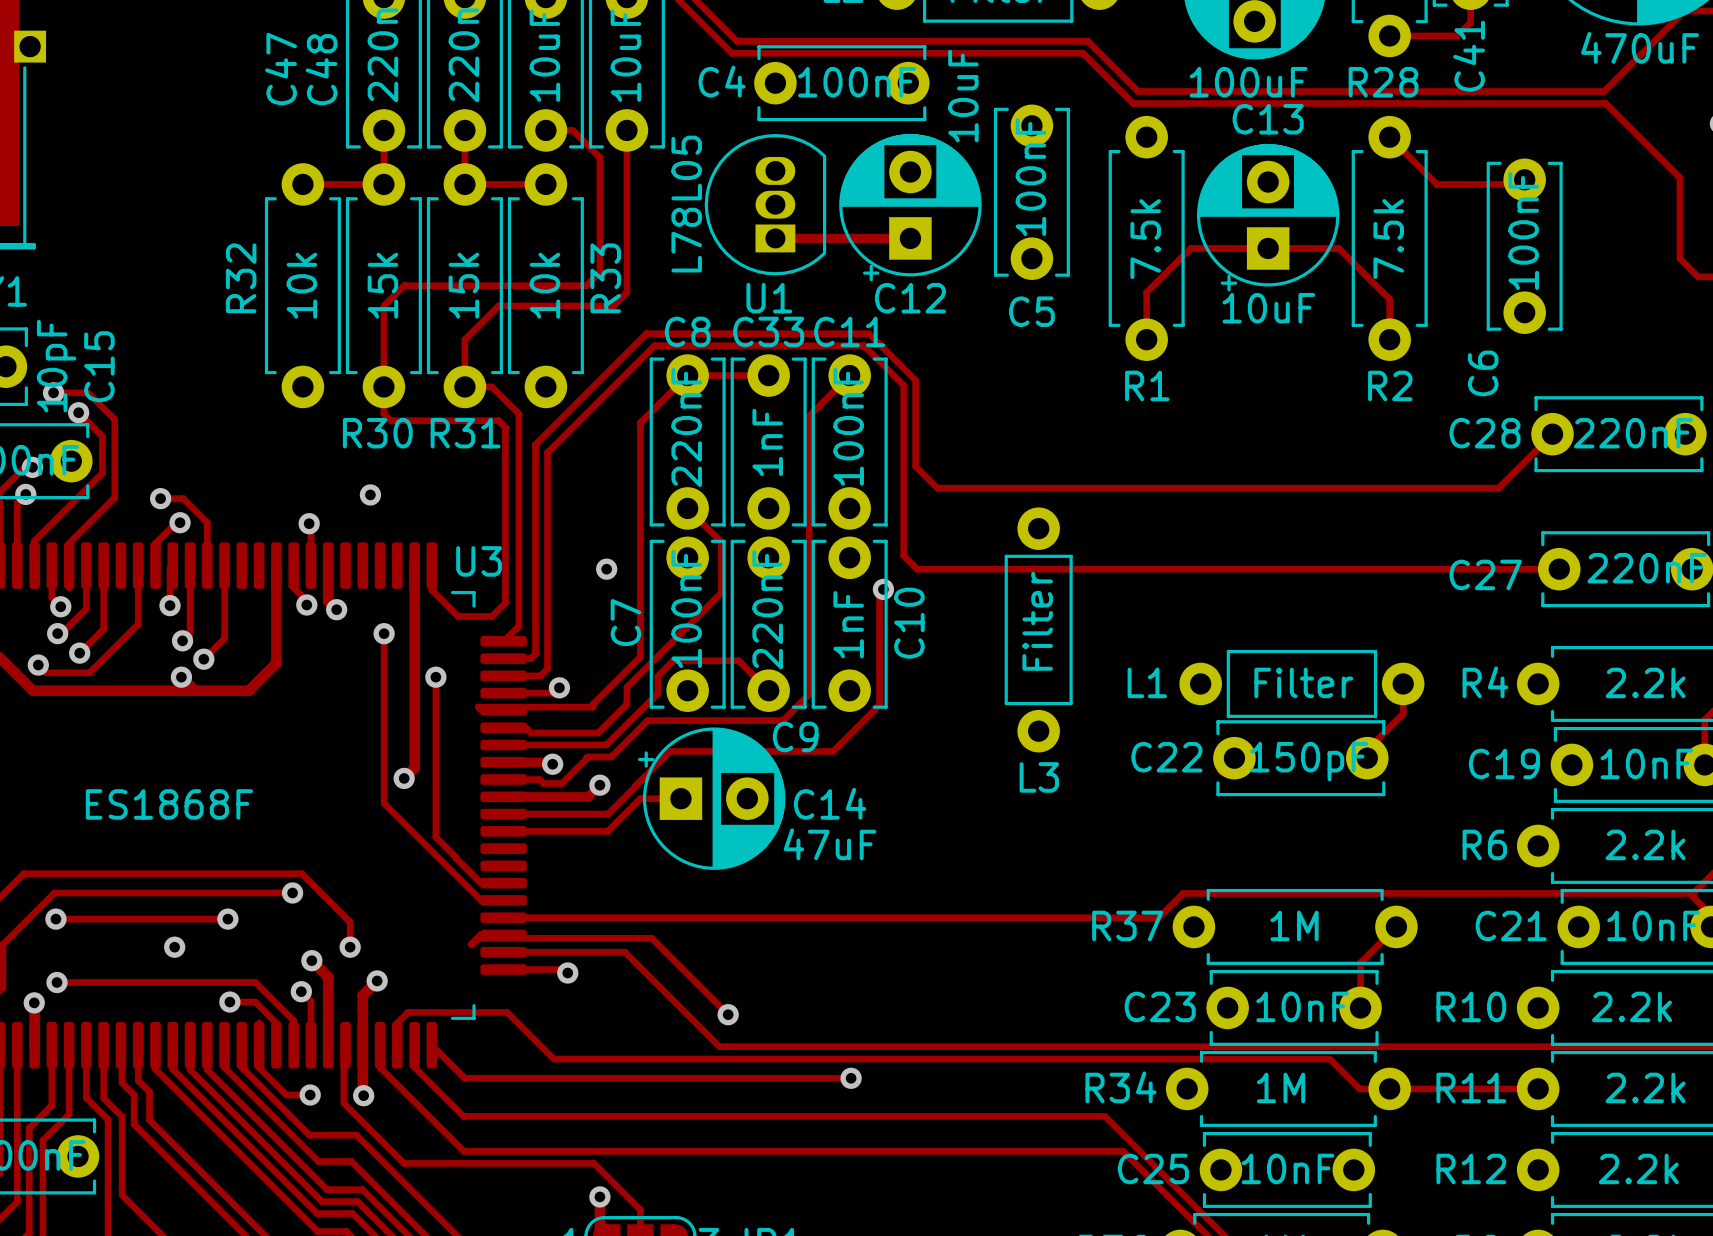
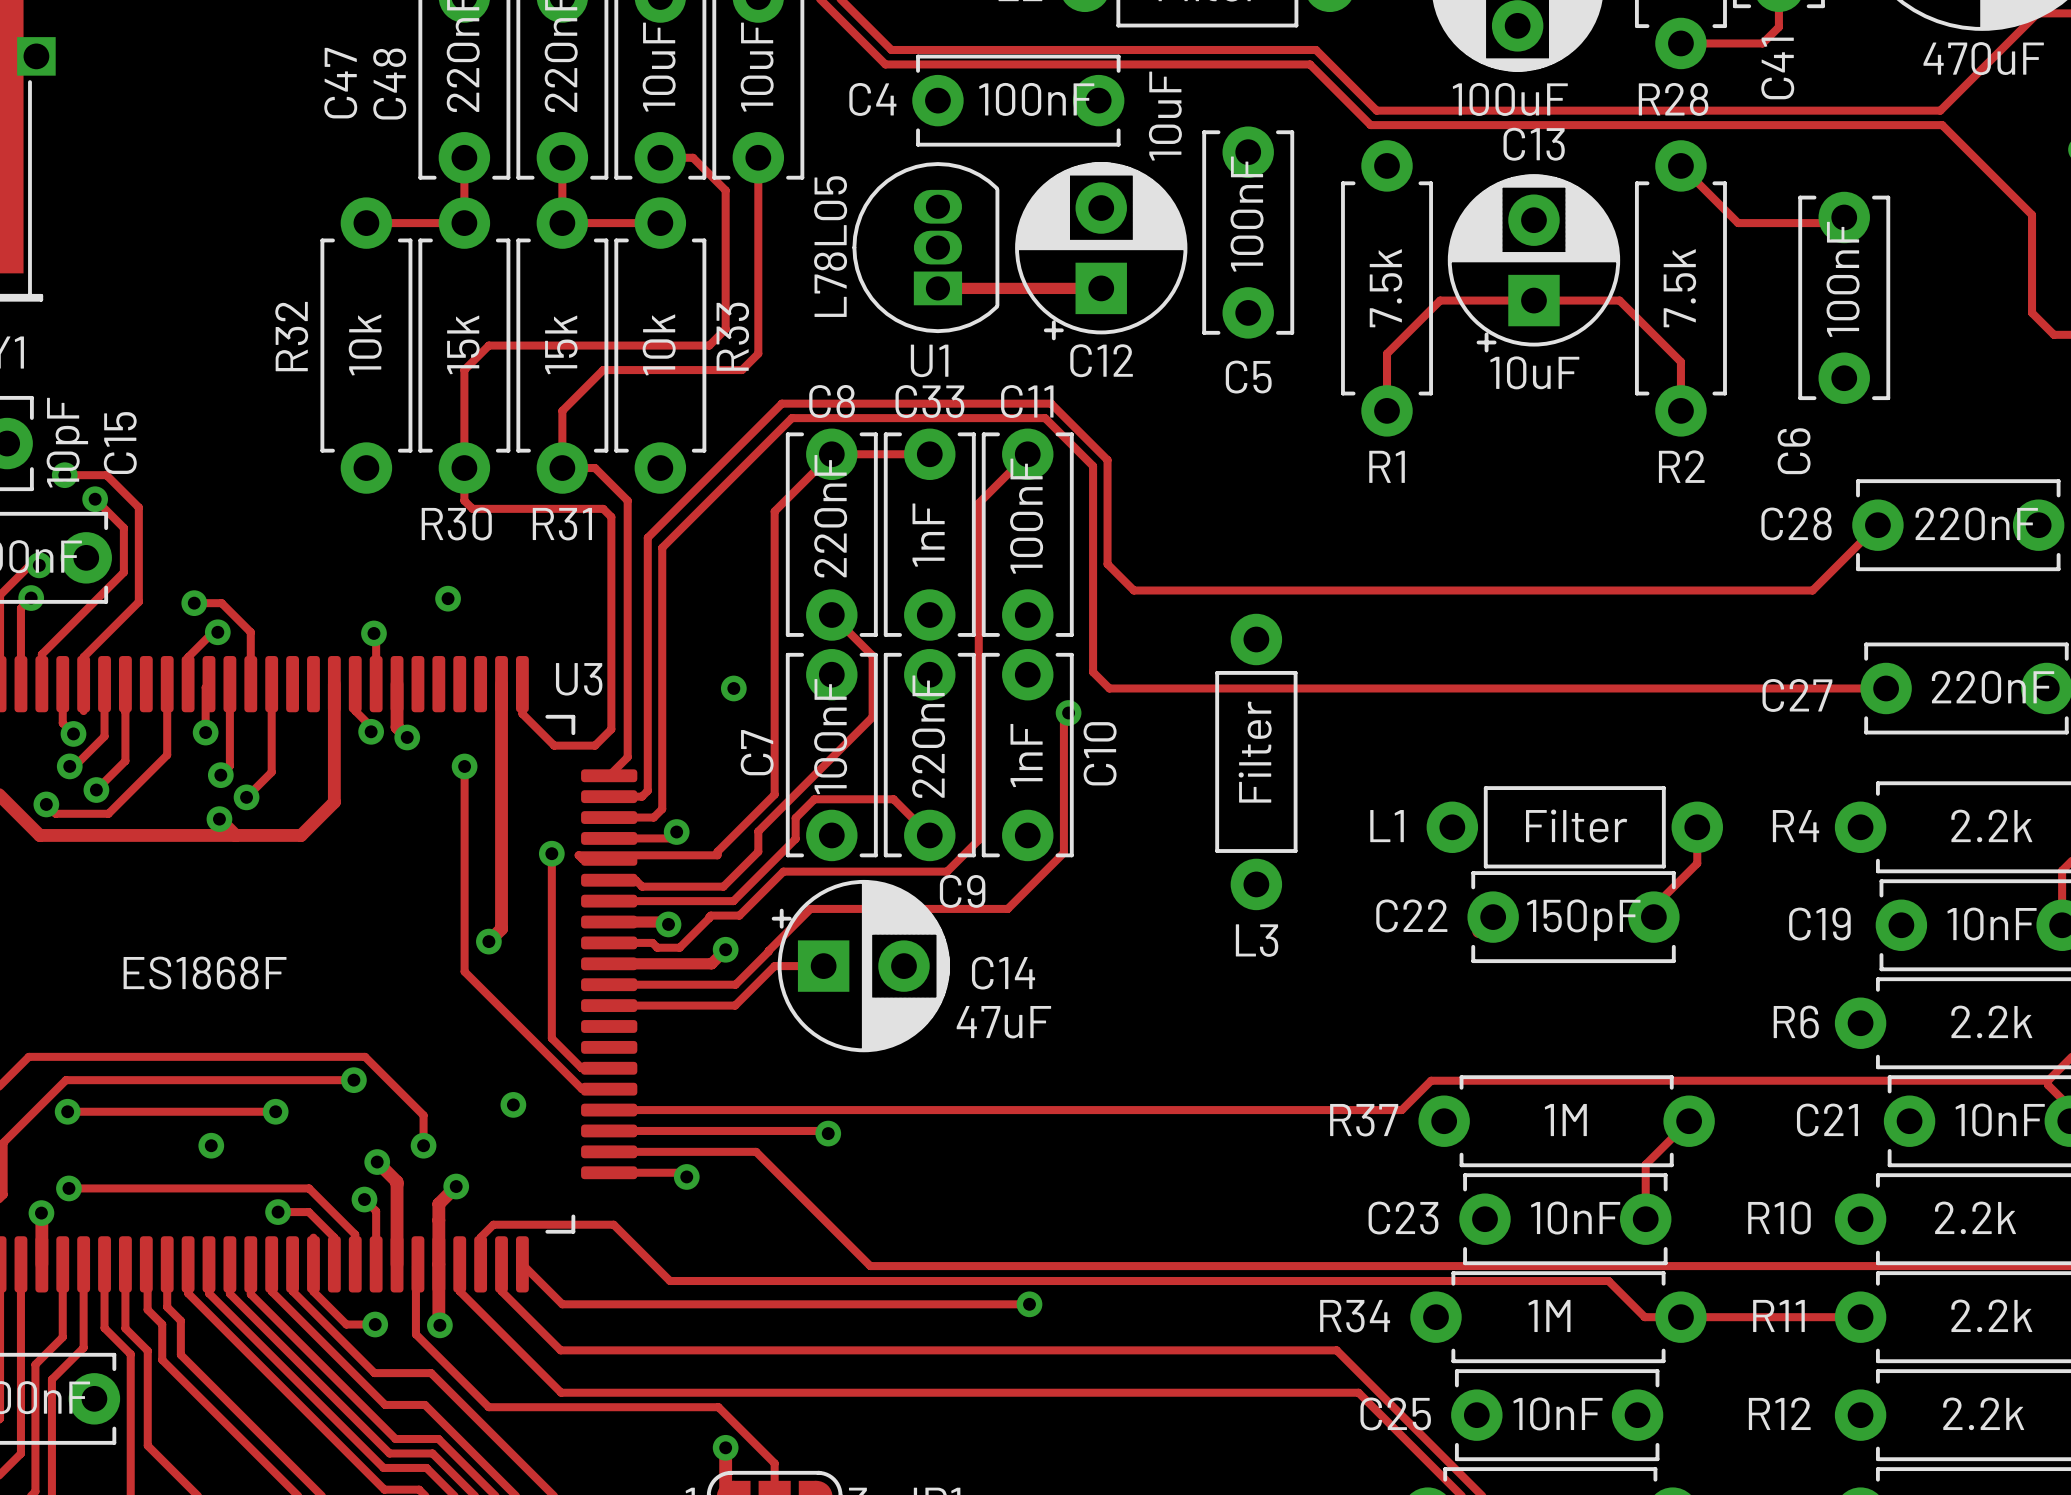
track: (435, 677) (435, 837) (456, 857) -> (551, 853) (551, 1037)
via position: (435, 677) -> (551, 853)
via: none -> (513, 1104)
track: (503, 934) (480, 934) (471, 944) (478, 938) (651, 938) (728, 1014) -> (609, 1130) (825, 1130) (828, 1133)
via position: (728, 1014) -> (828, 1133)

